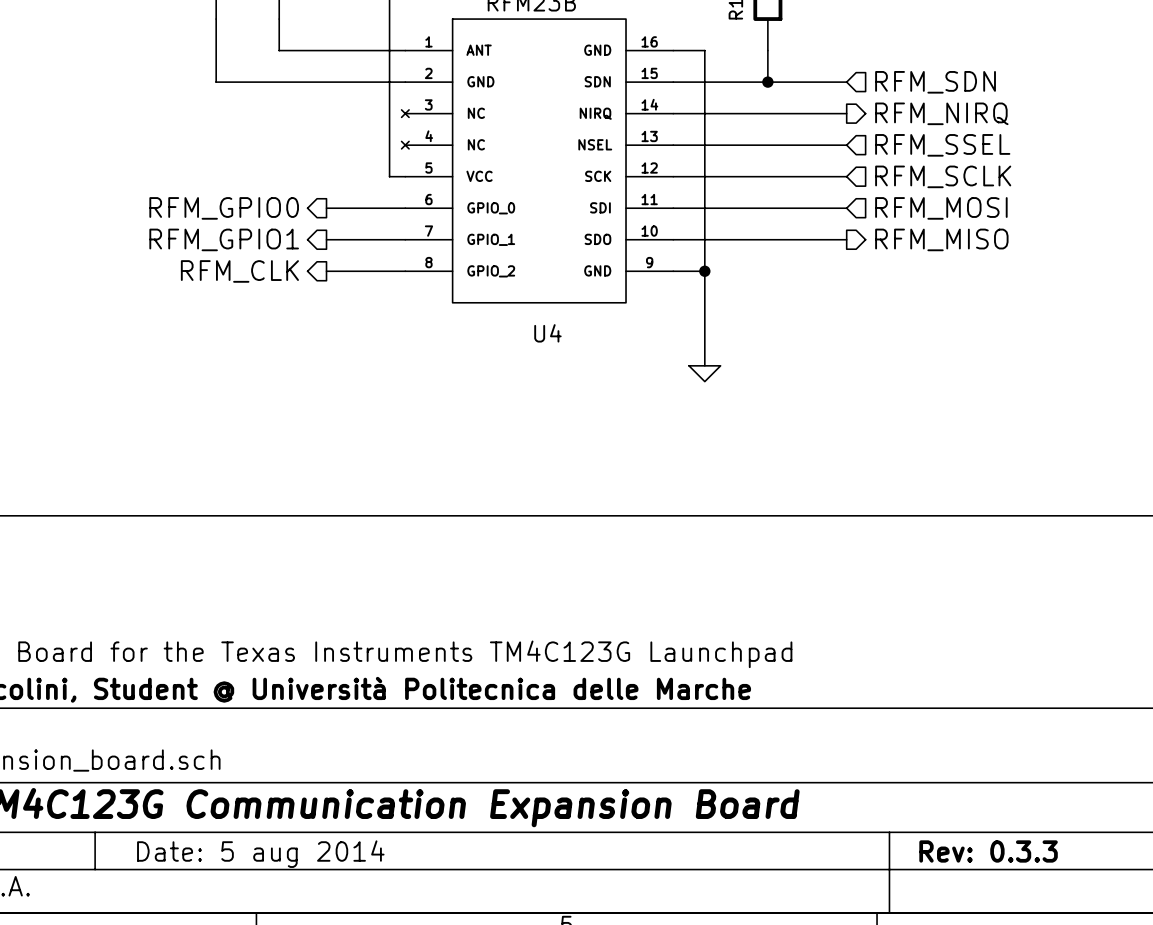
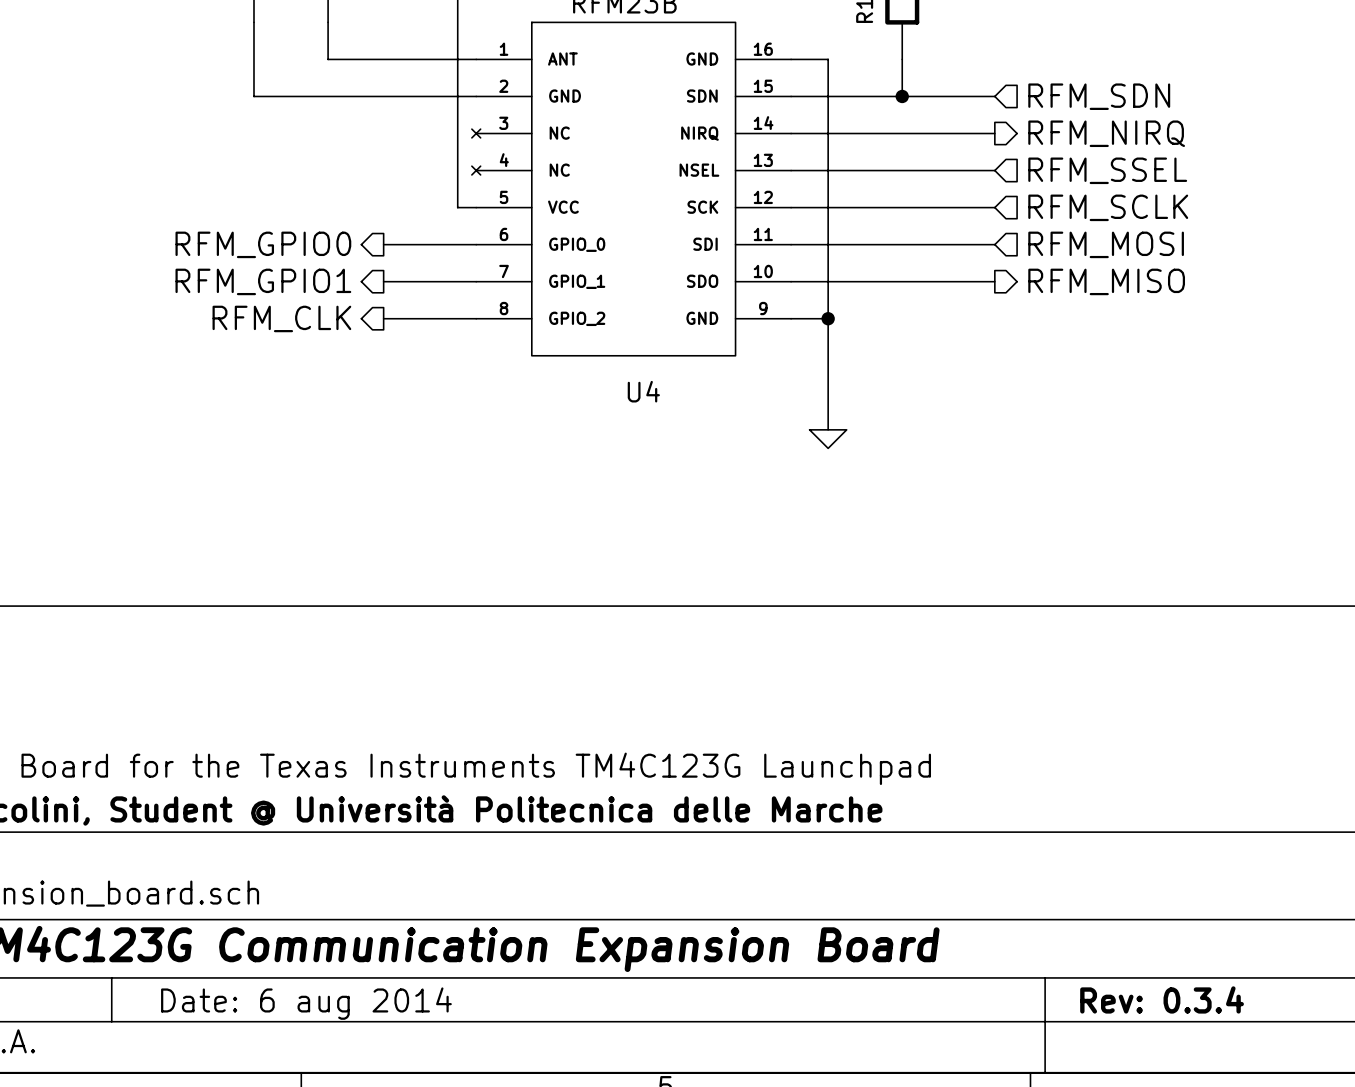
title block: Rev: 0.3.3 (988, 851) -> Rev: 0.3.4 (1162, 999)
title block: Date: 5 aug 2014 (260, 854) -> Date: 6 aug 2014 (306, 1003)

